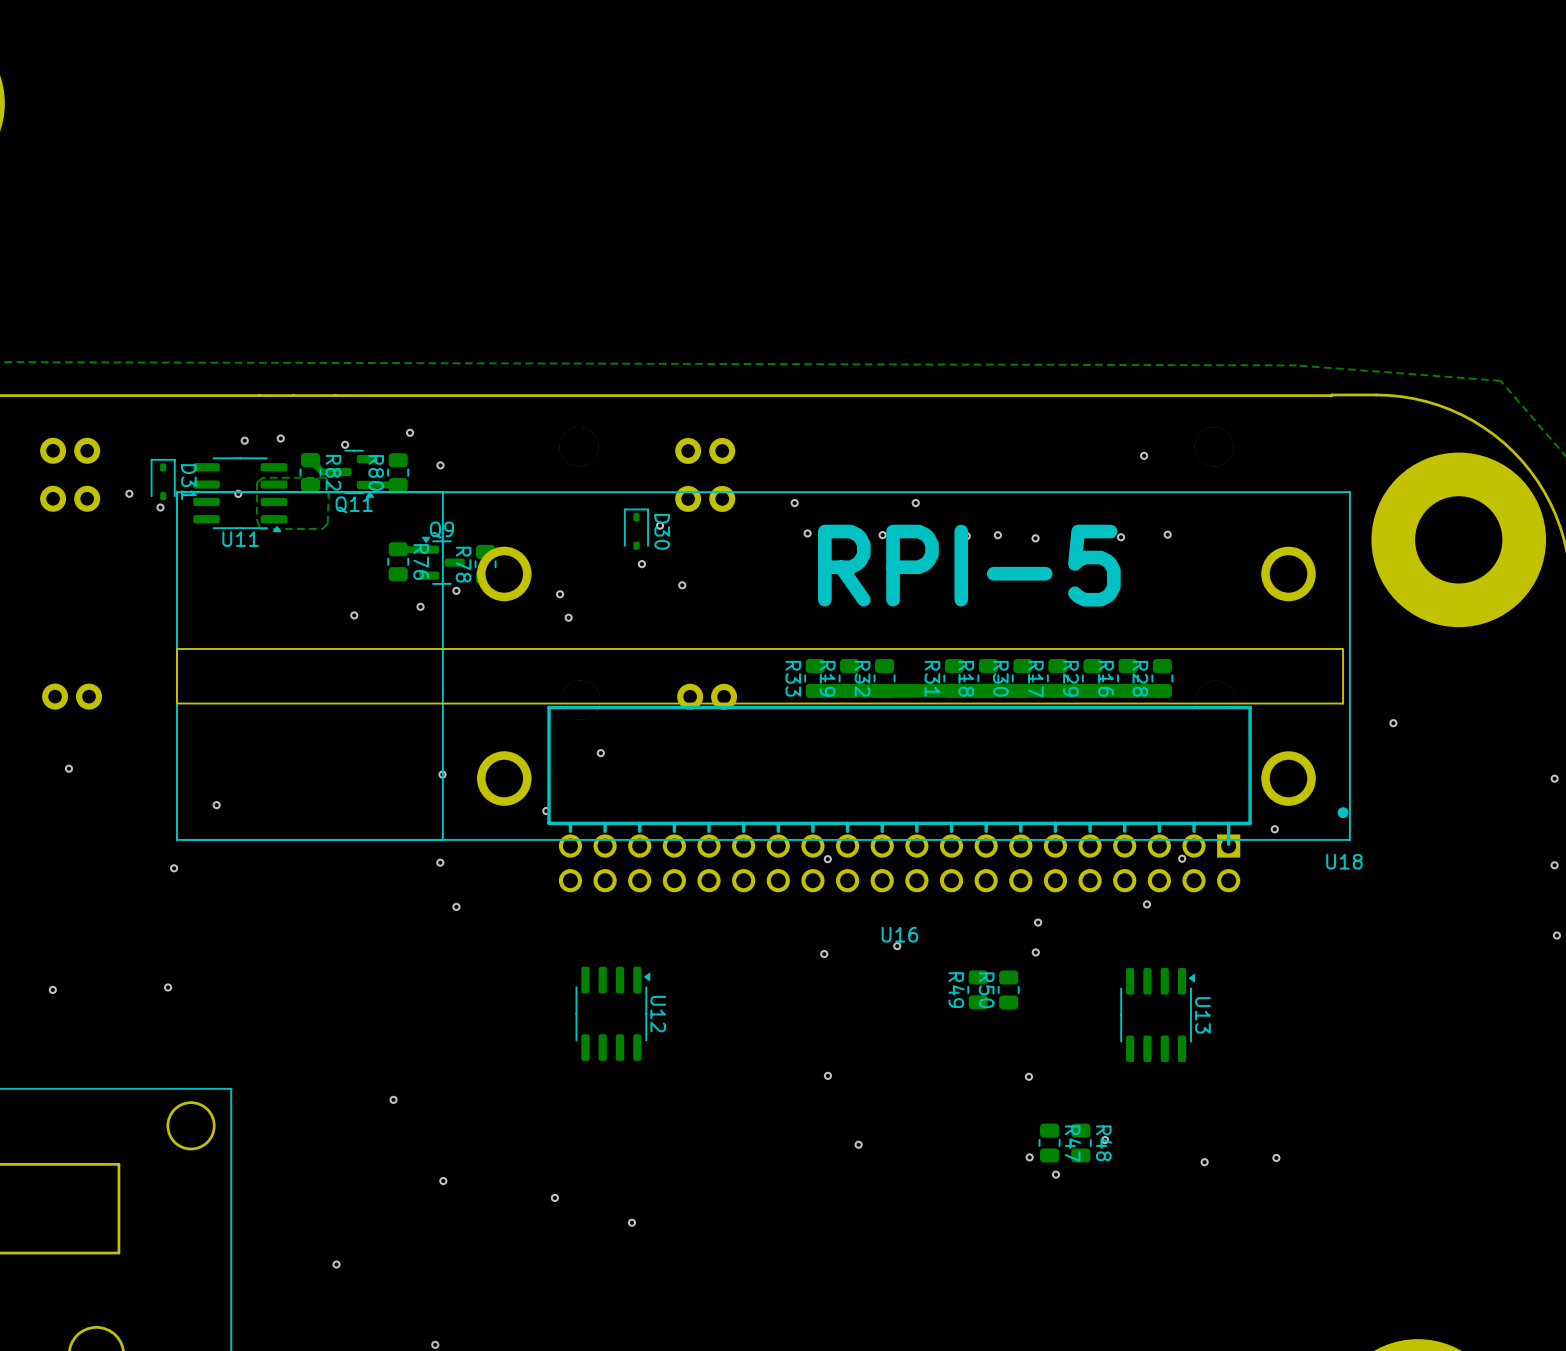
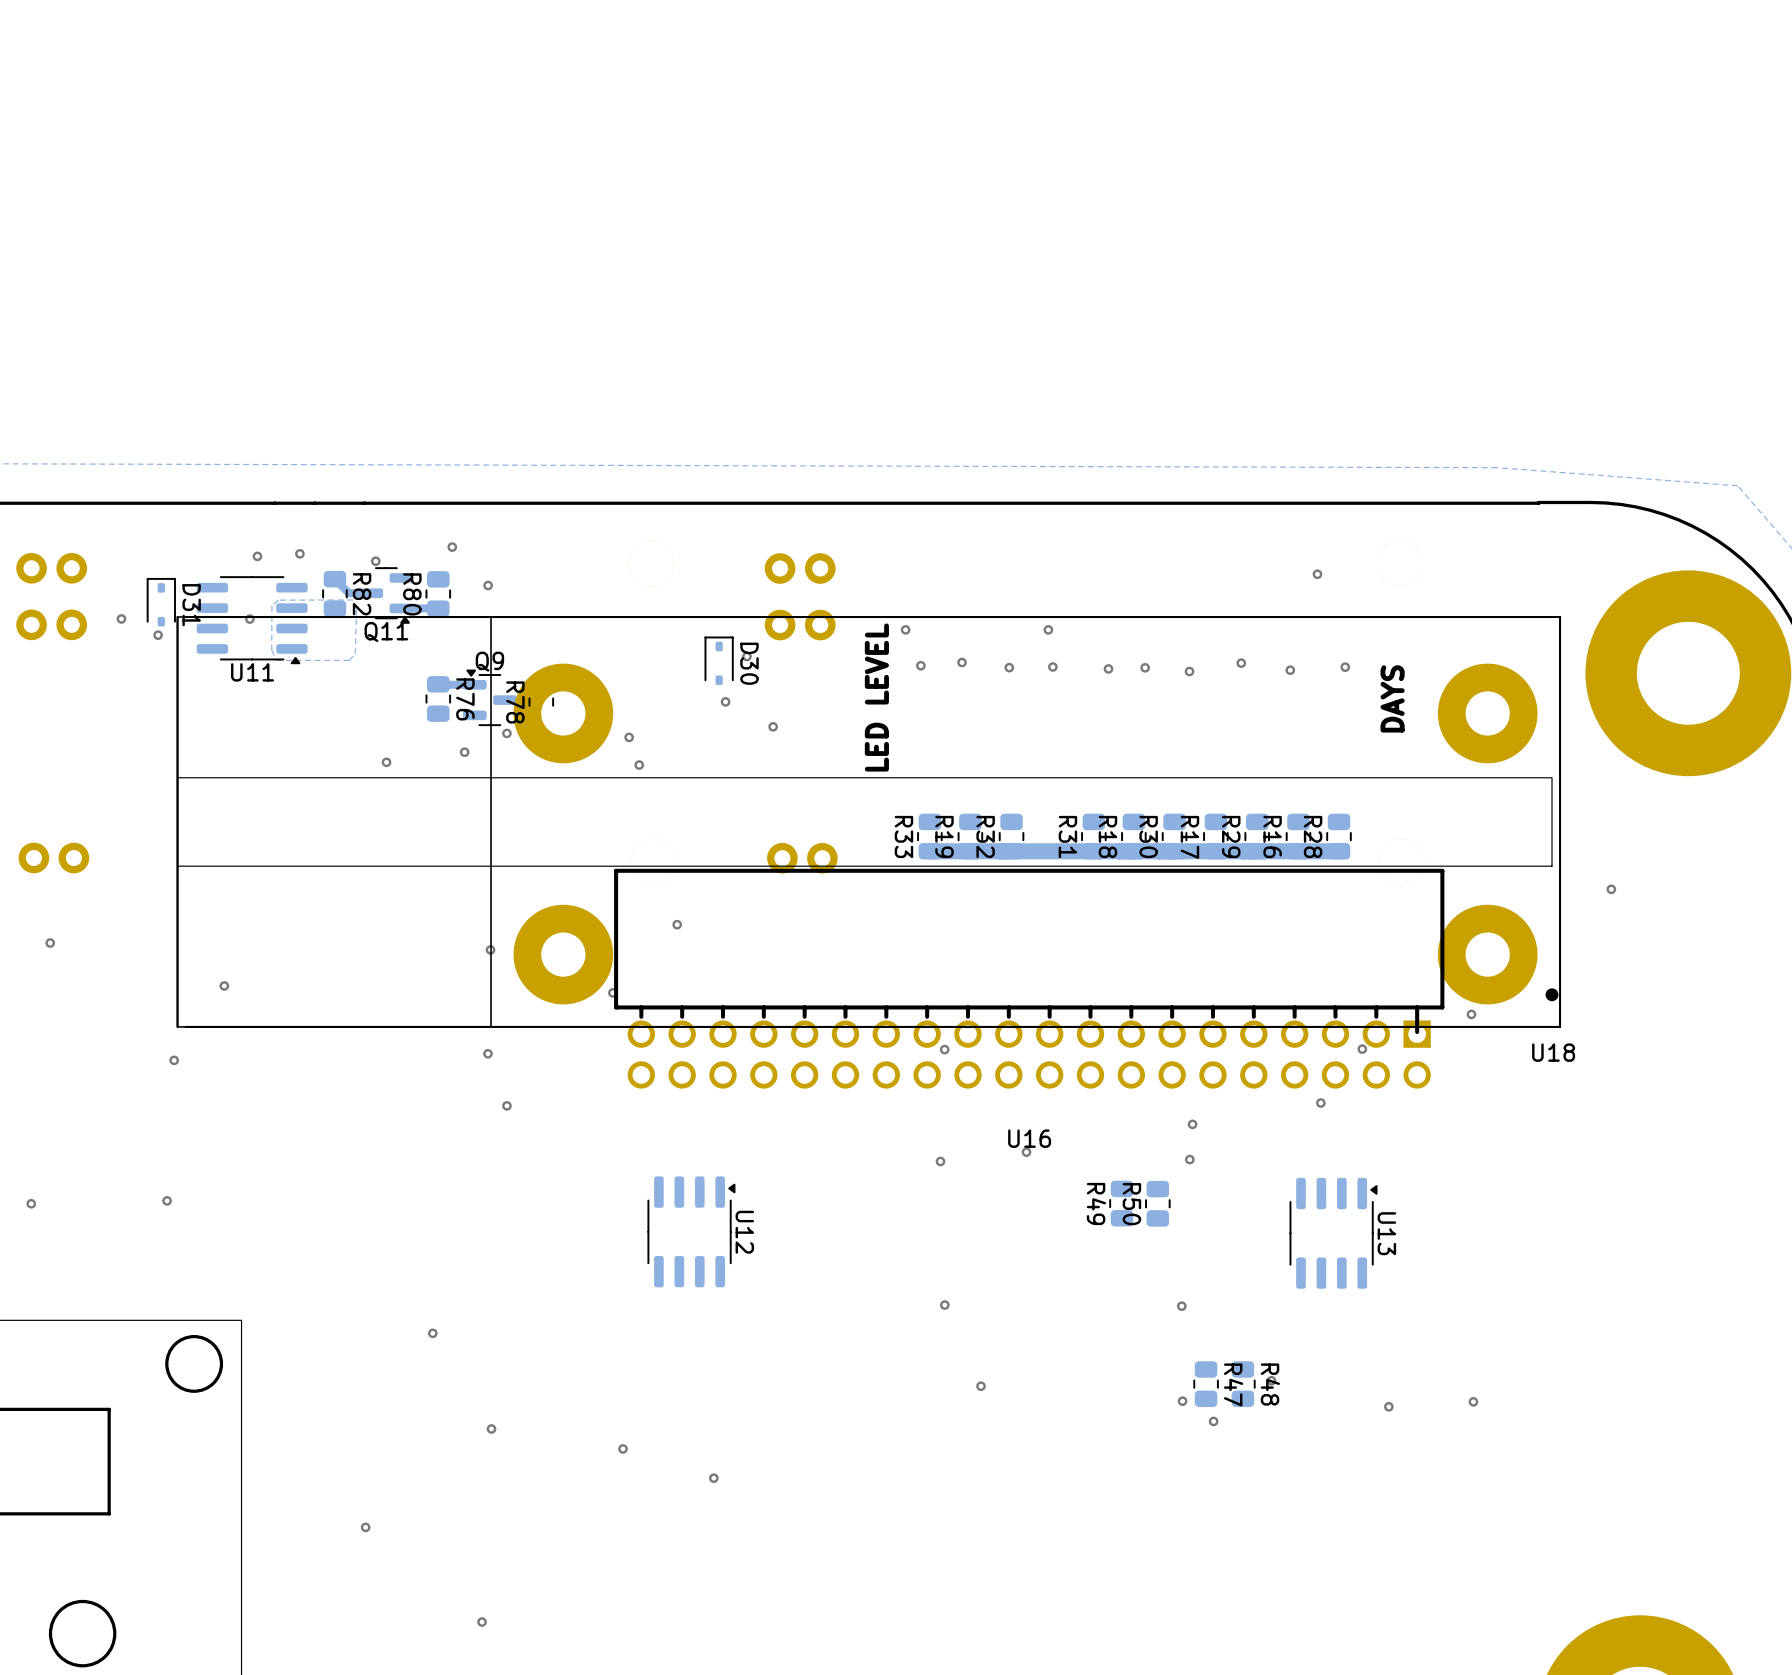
U18 footprint: [176, 491, 1351, 841] -> [176, 615, 1562, 1028]
text: none -> LED LEVEL (876, 697)
text: none -> DAYS (1392, 698)
text: RPI-5 (969, 565) -> none

